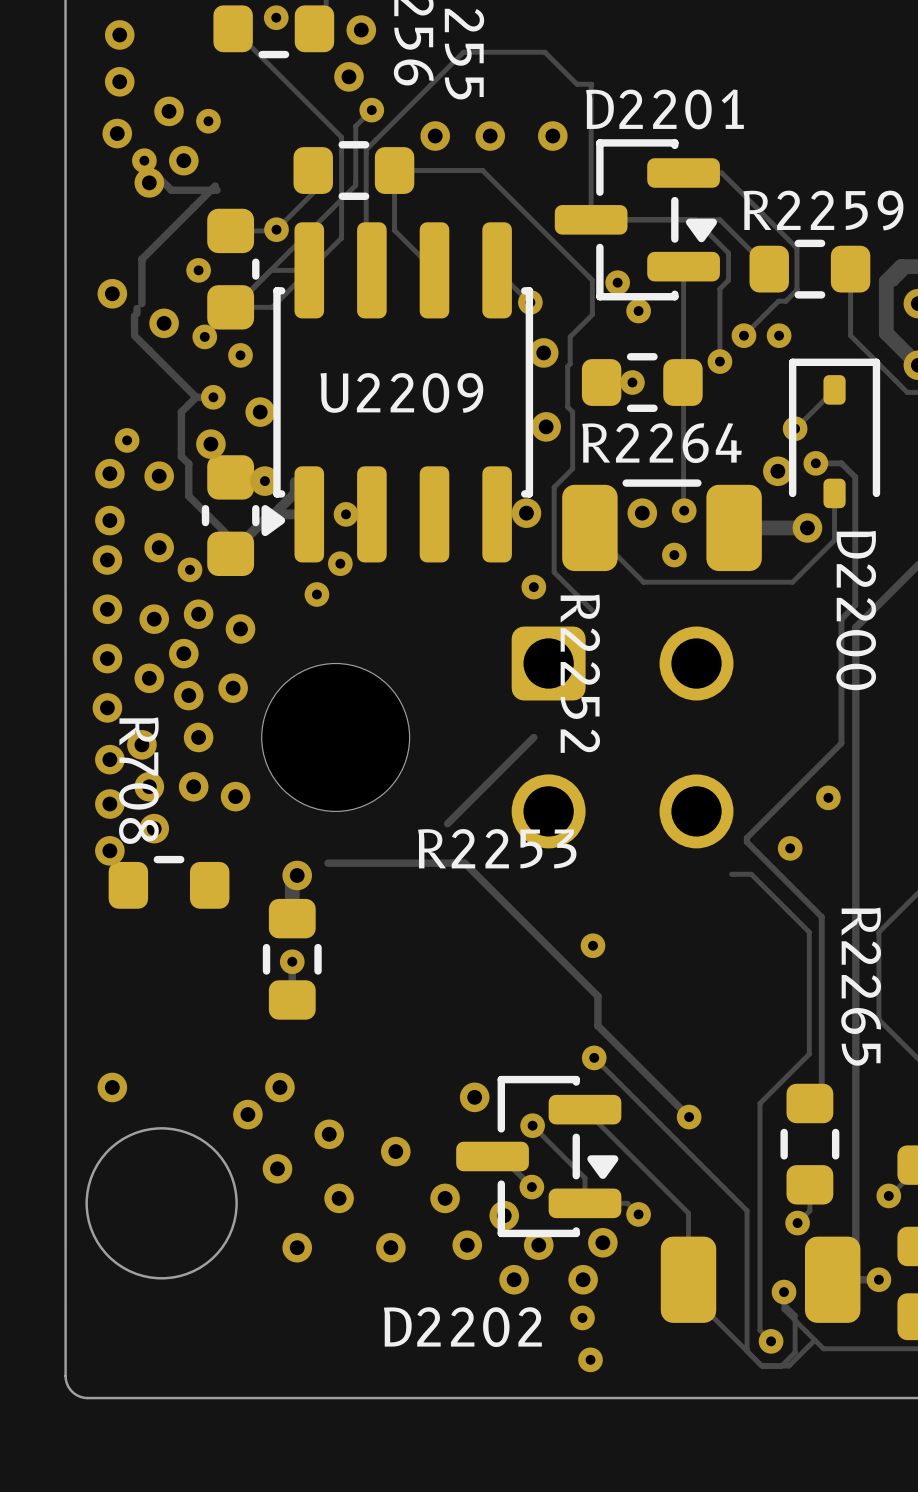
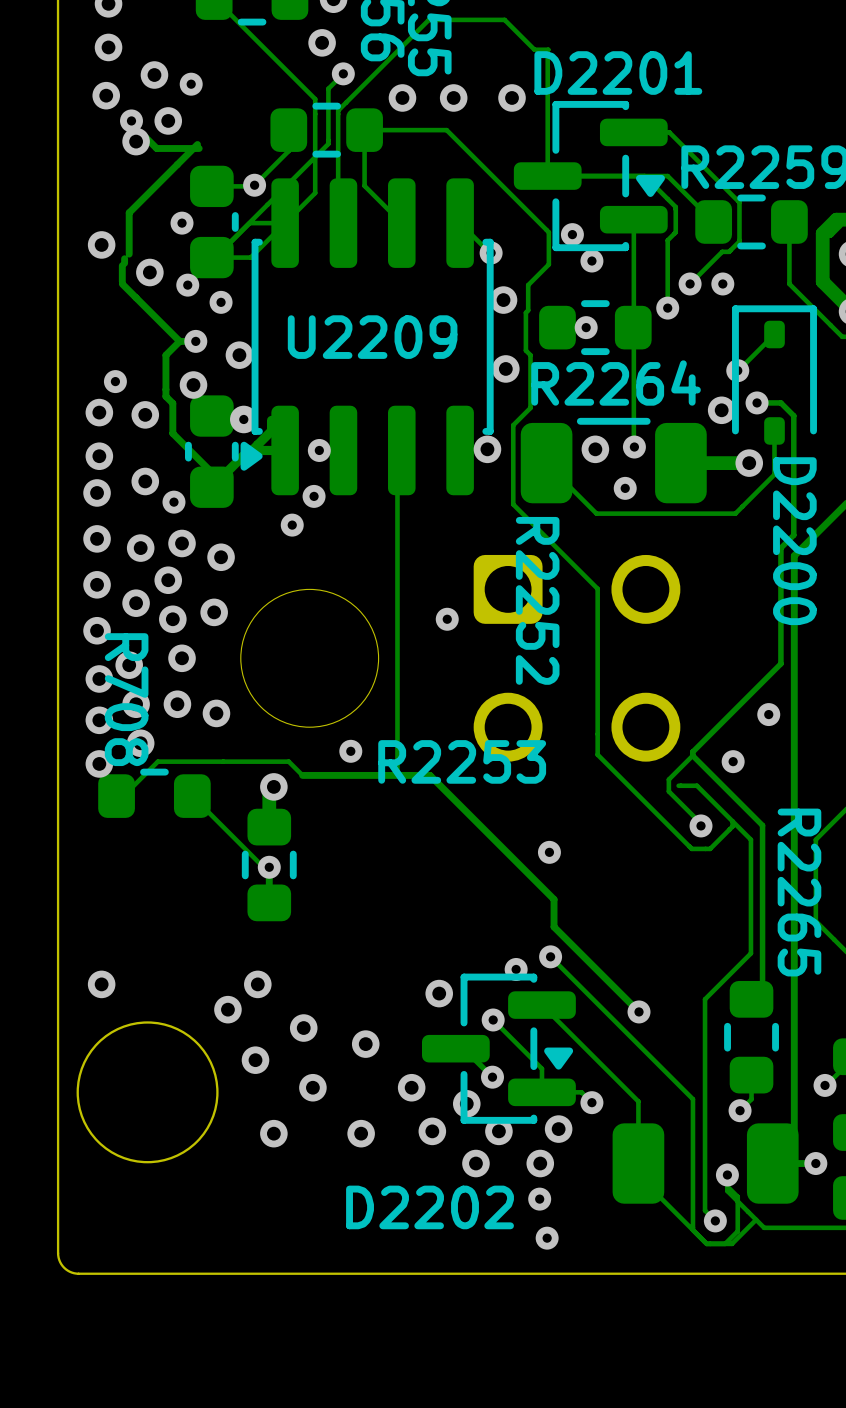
track: none -> (401, 466) (397, 470) (397, 775)
via position: (533, 587) -> (447, 619)
track: none -> (548, 540) (597, 588) (597, 754) (691, 848) (710, 848) (732, 826) (732, 821)
track: (533, 737) (447, 823) -> none
via: none -> (350, 751)
track: none -> (692, 755) (668, 779) (668, 791) (701, 823) (701, 825)
track: none -> (302, 775) (288, 761) (157, 761) (123, 796) (116, 796)
track: none -> (192, 796) (263, 867) (269, 867)
via: none -> (701, 825)
via: none -> (516, 969)

